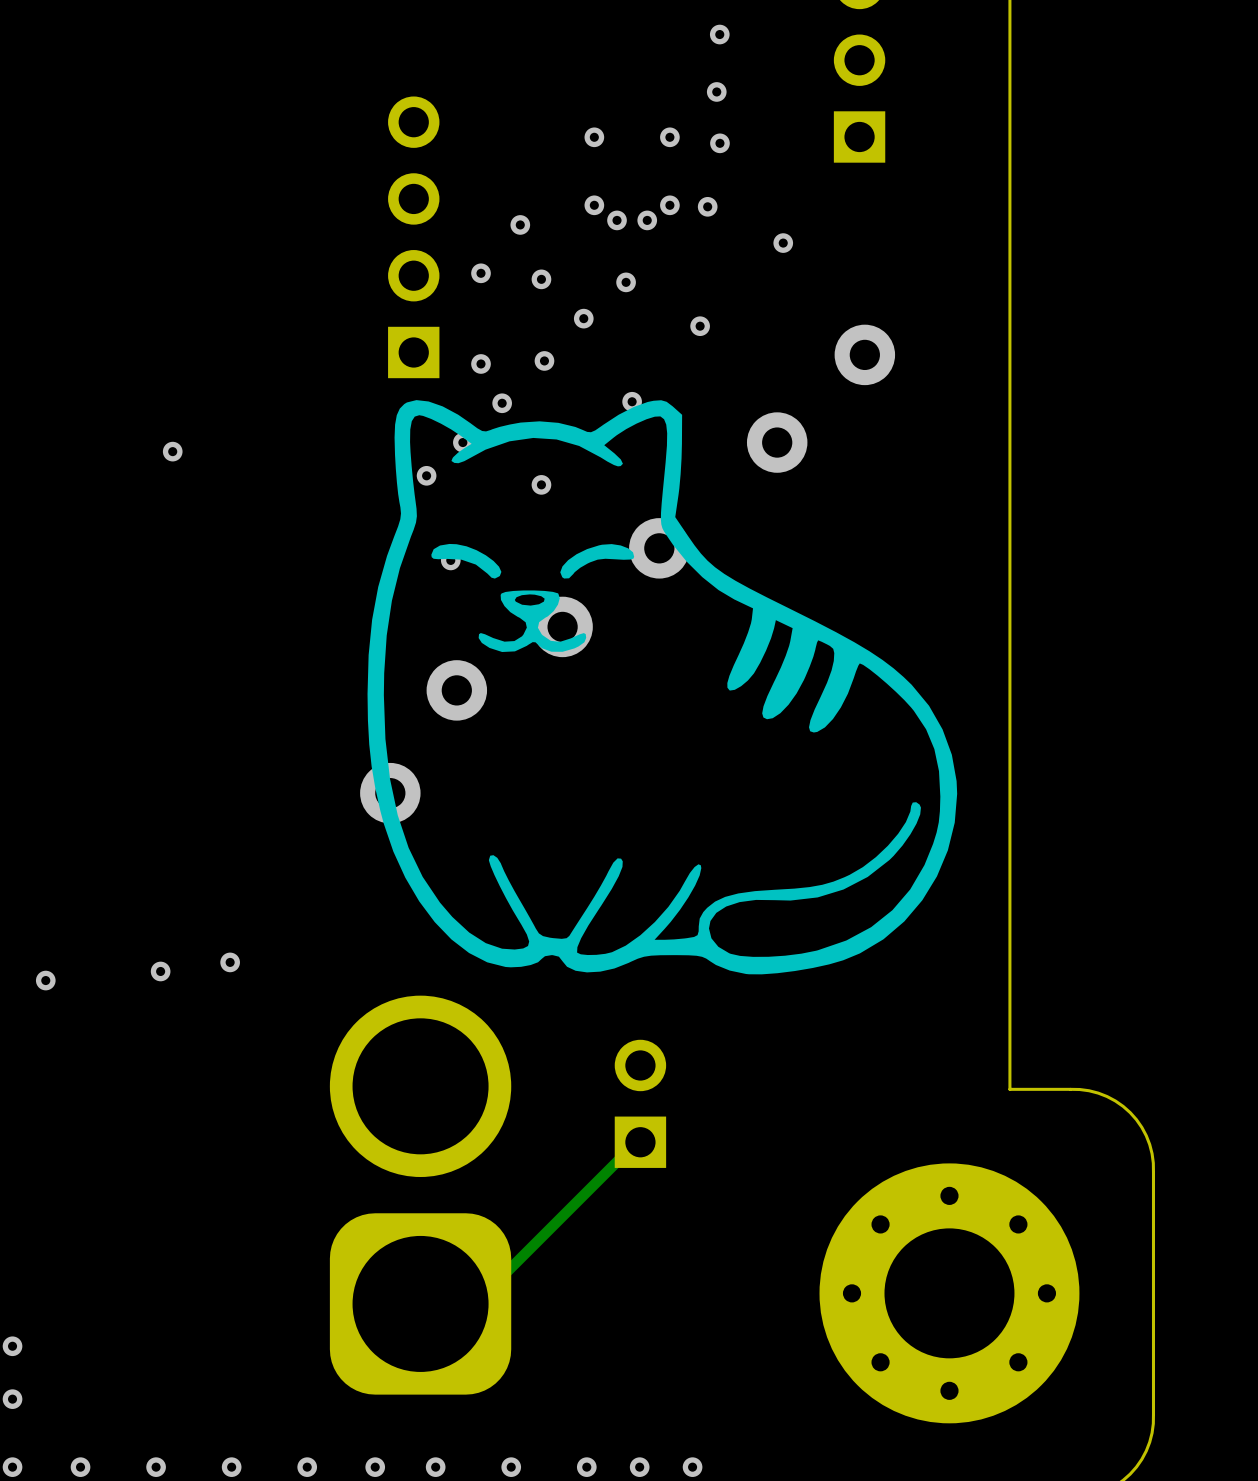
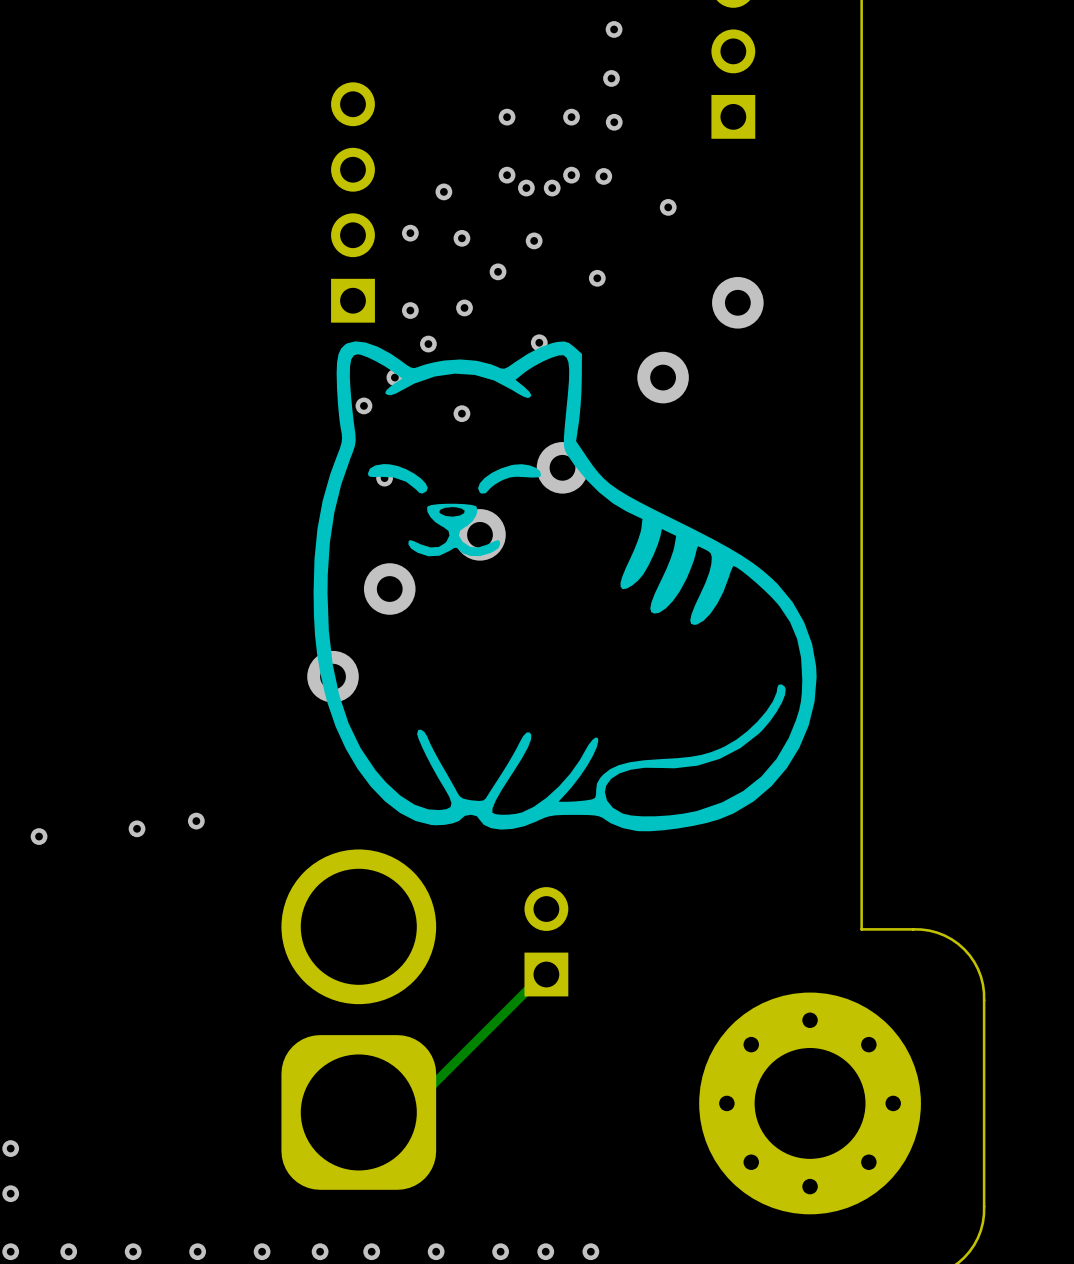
via: (172, 451) -> none

